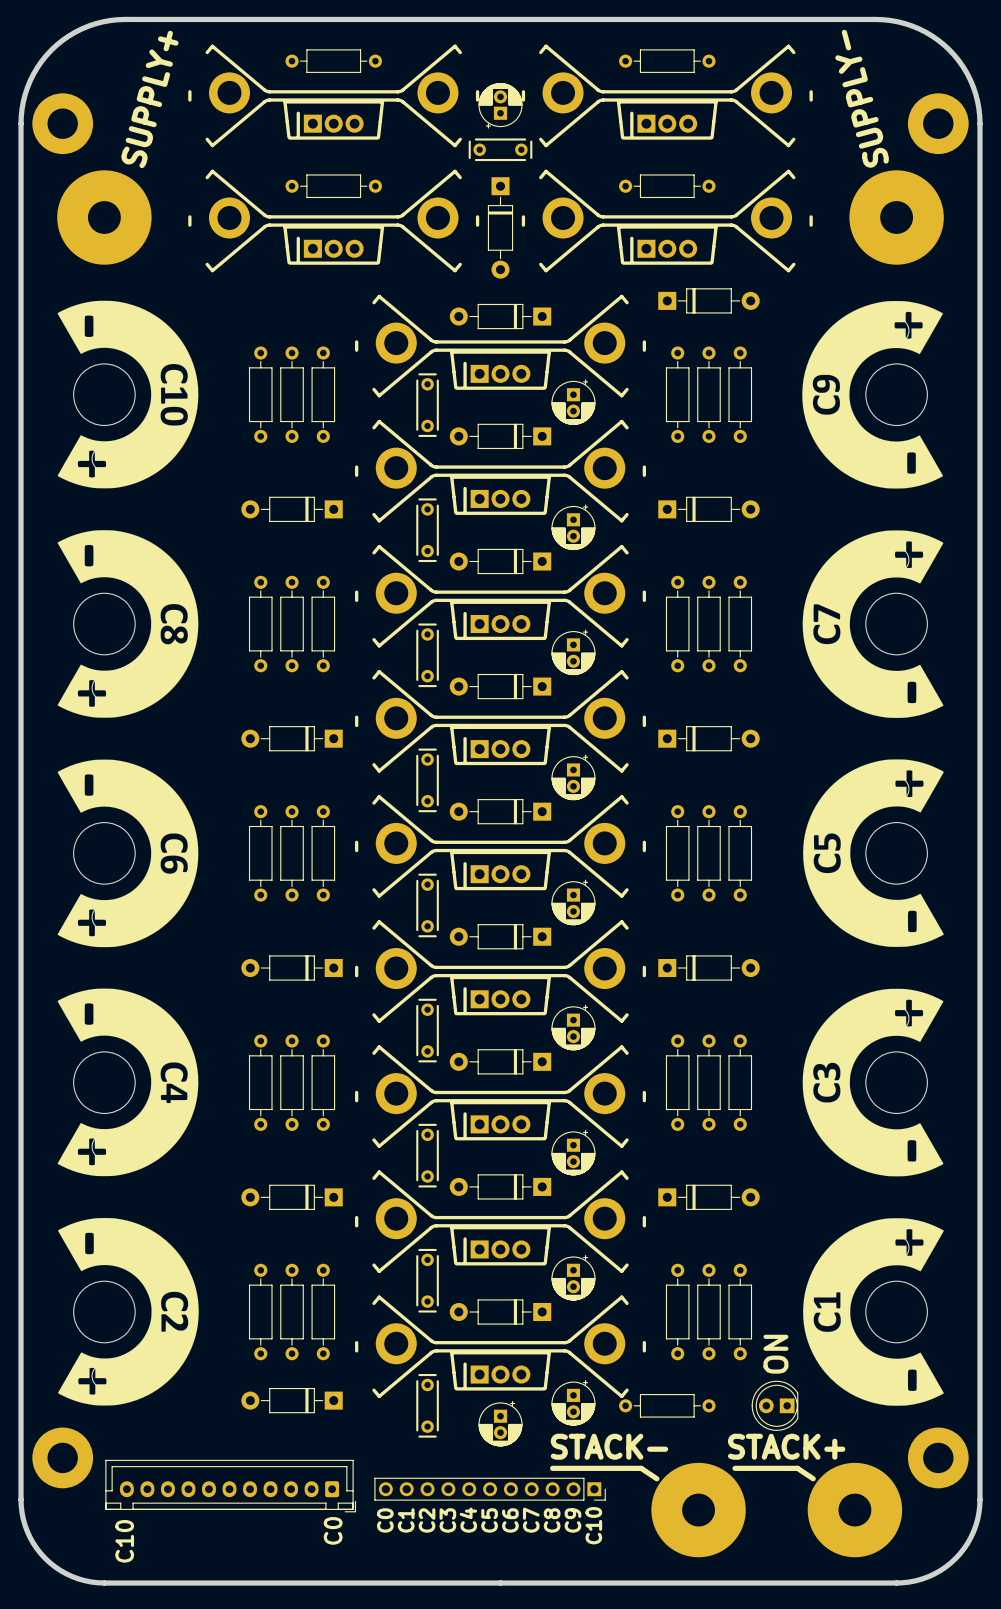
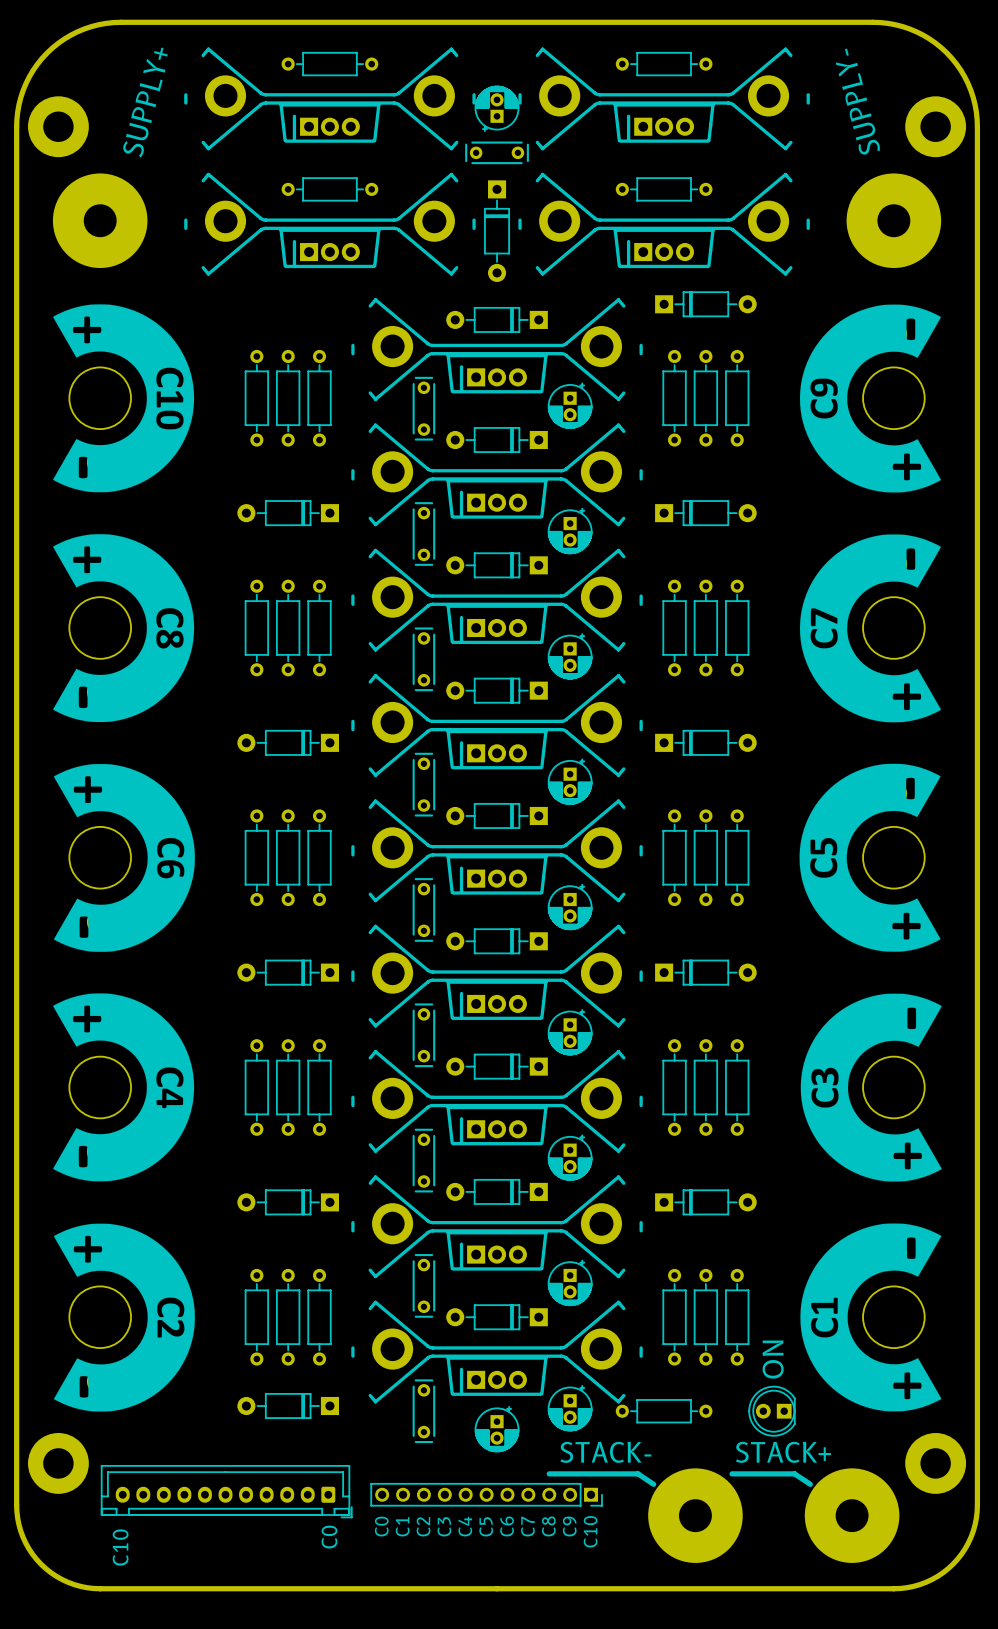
drawing shape: [57, 300, 199, 489] -> [53, 304, 195, 493]
drawing shape: [802, 301, 943, 489] -> [799, 304, 941, 493]
drawing shape: [57, 530, 199, 718] -> [53, 534, 195, 723]
drawing shape: [802, 530, 944, 718] -> [799, 534, 941, 723]
drawing shape: [57, 759, 199, 948] -> [53, 764, 195, 952]
drawing shape: [803, 759, 944, 947] -> [799, 763, 941, 952]
drawing shape: [57, 988, 199, 1177] -> [53, 993, 195, 1182]
drawing shape: [802, 988, 944, 1177] -> [800, 993, 942, 1182]
drawing shape: [58, 1218, 199, 1406] -> [53, 1223, 195, 1412]
drawing shape: [803, 1218, 944, 1406] -> [800, 1223, 942, 1412]

